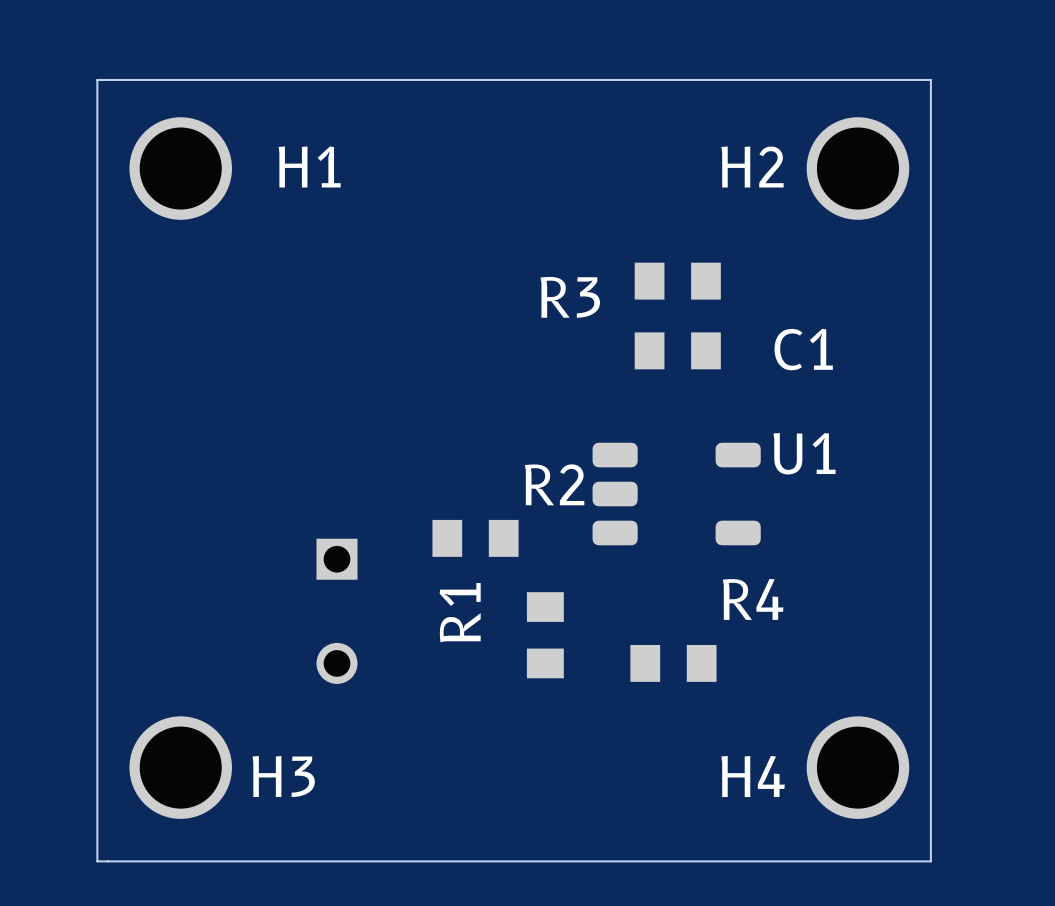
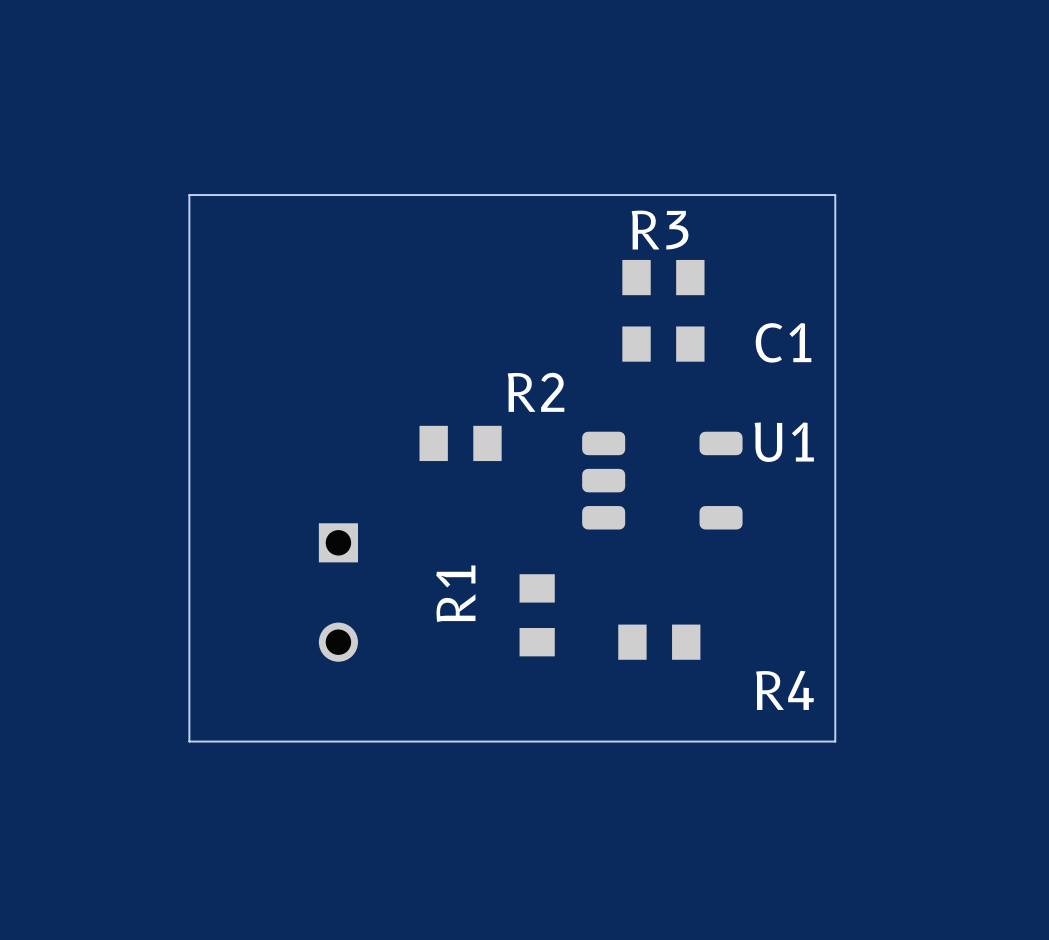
board edge: (97, 79) (97, 861) (930, 861) (930, 79) (97, 79) -> (189, 195) (189, 741) (835, 741) (835, 195) (189, 195)
H1: (180, 168) -> none
H2: (857, 168) -> none
R3 name position: R3 (570, 297) -> R3 (660, 230)
R2 position: (475, 538) -> (460, 443)
R4 name position: R4 (753, 599) -> R4 (785, 690)
H3: (180, 767) -> none
H4: (857, 767) -> none

